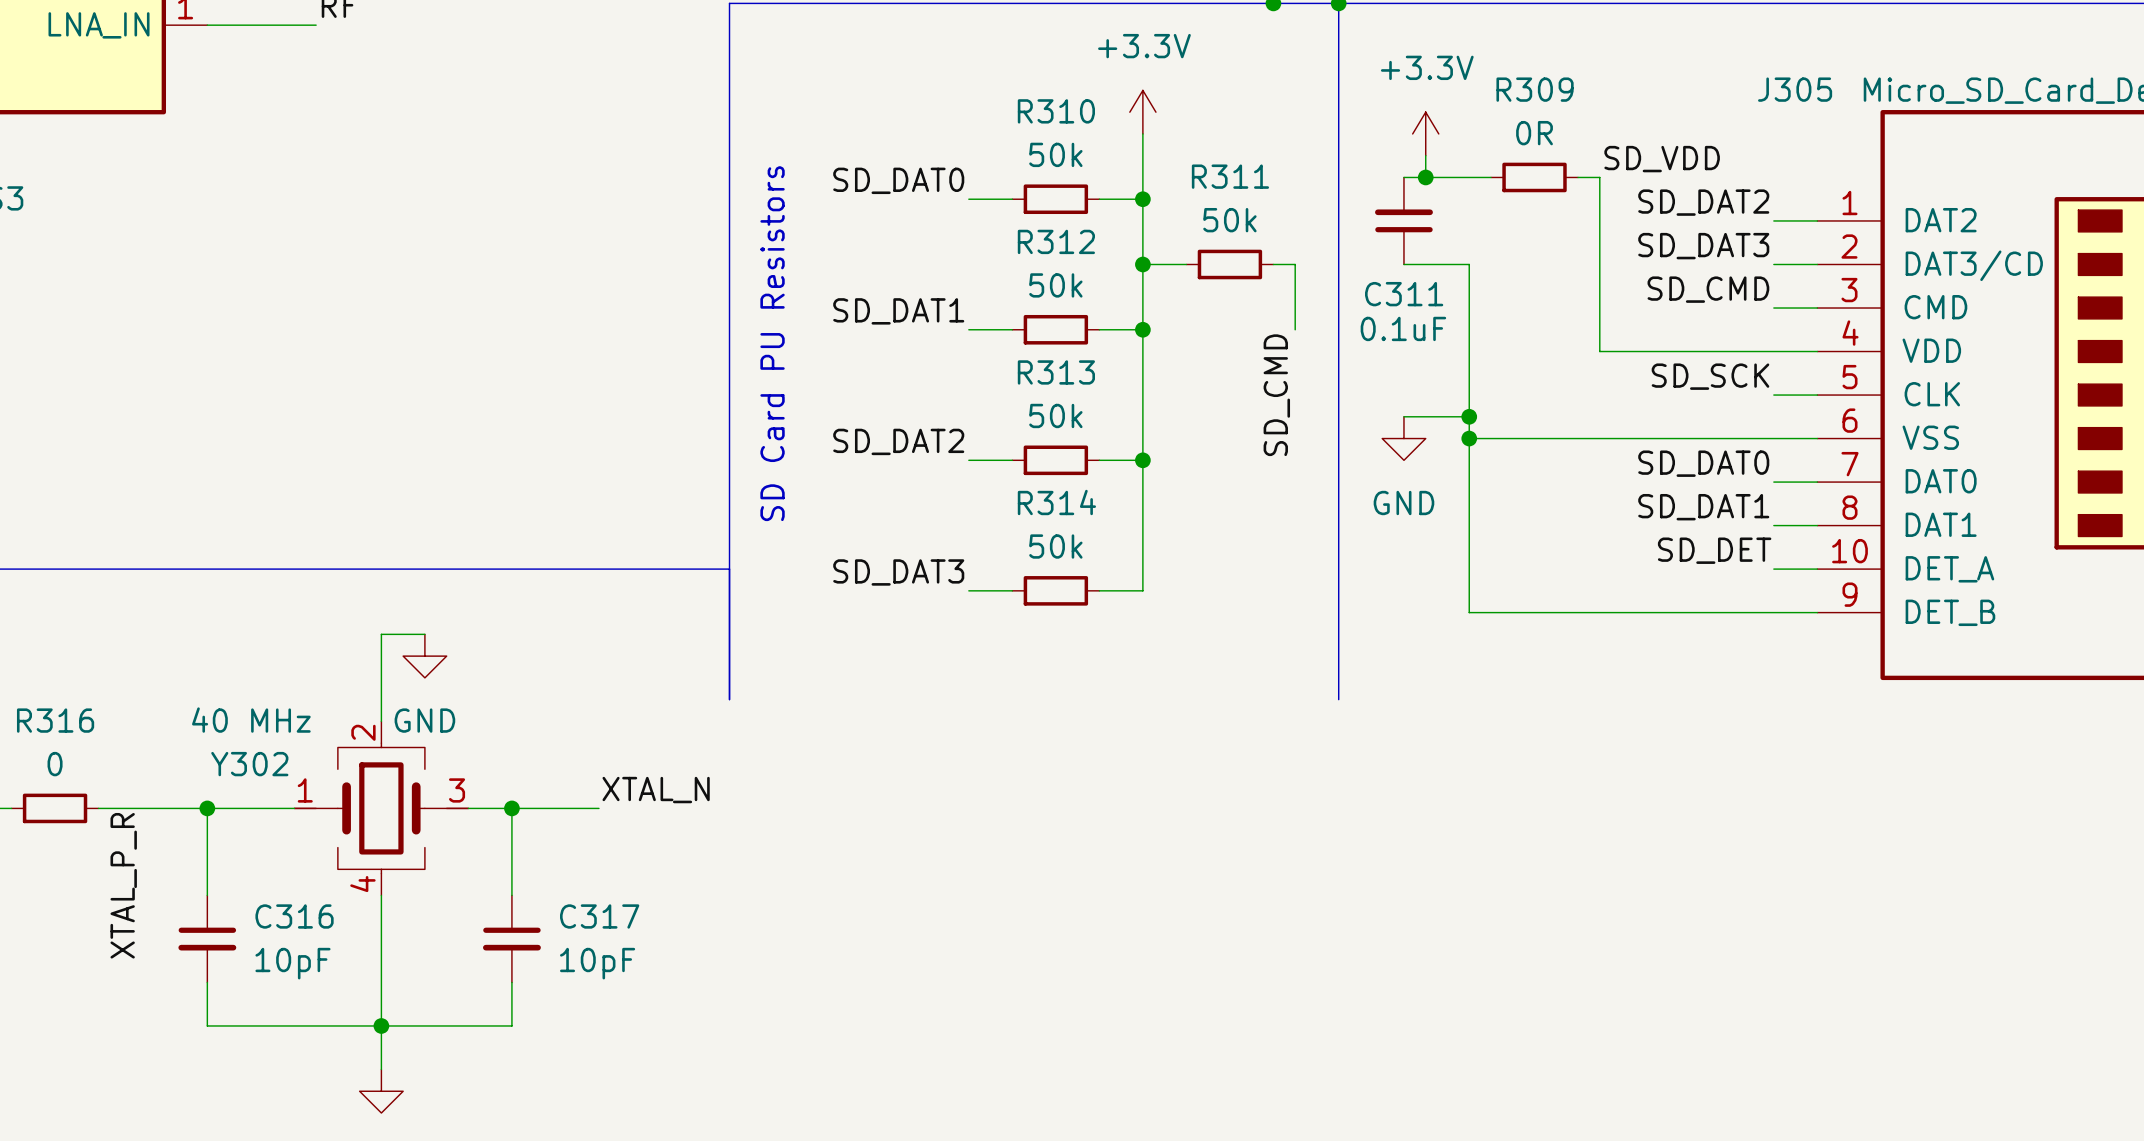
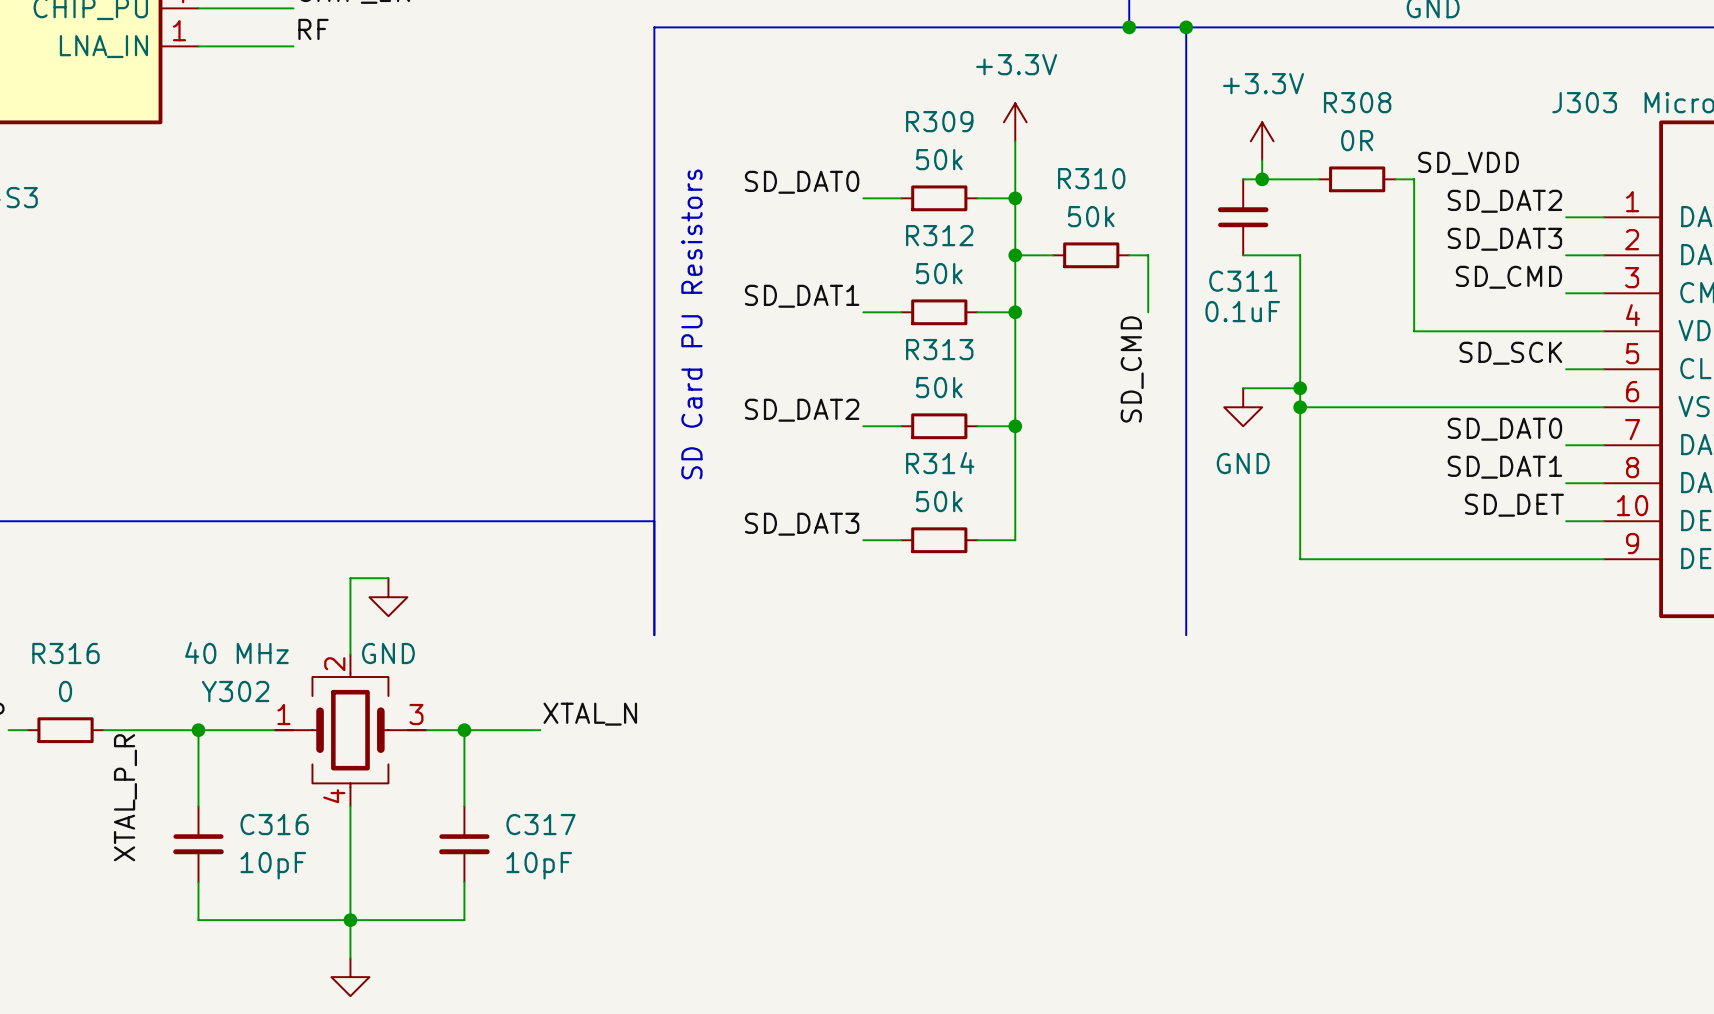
R309 name: R309 (1535, 89) -> R308 (1357, 102)
J305 name: J305 (1795, 89) -> J303 (1584, 102)
R310 name: R310 (1056, 111) -> R309 (939, 121)
R311 name: R311 (1230, 176) -> R310 (1091, 178)

